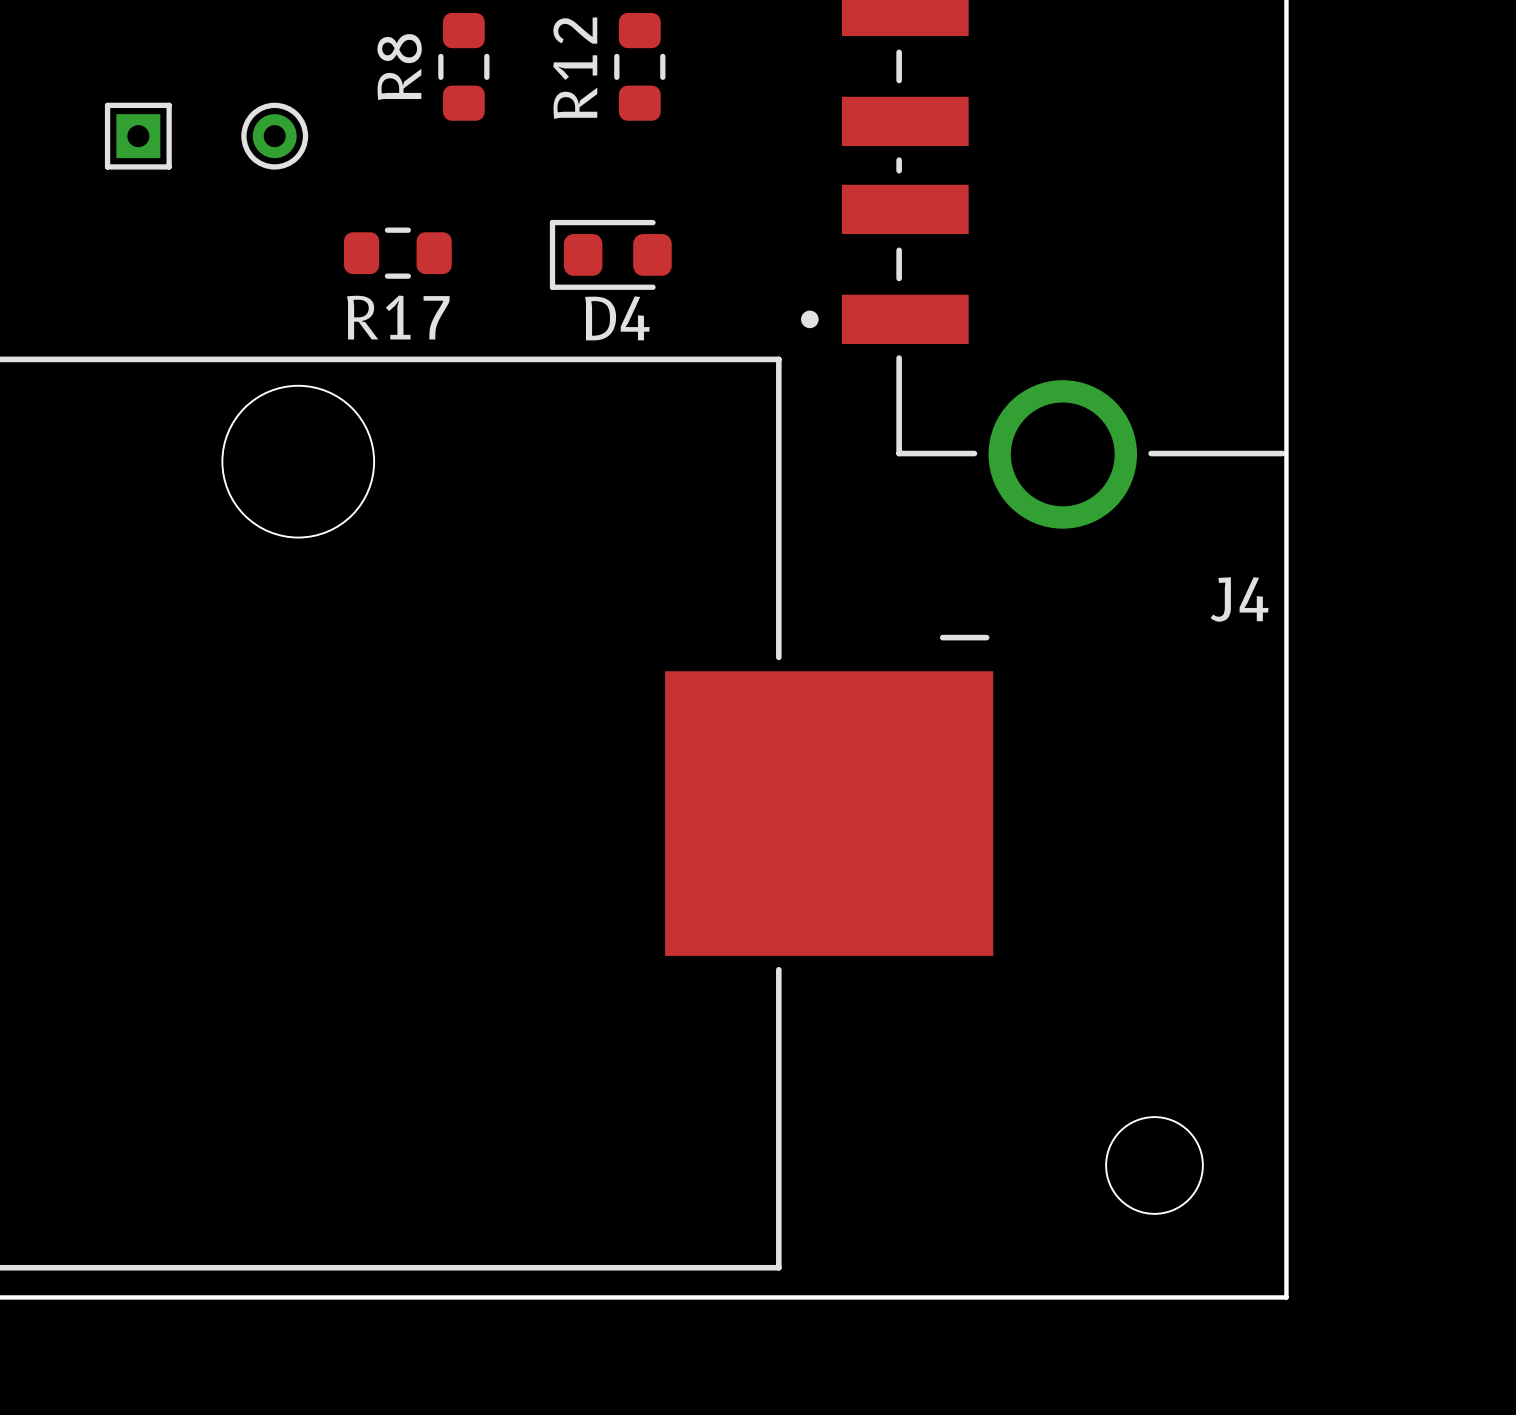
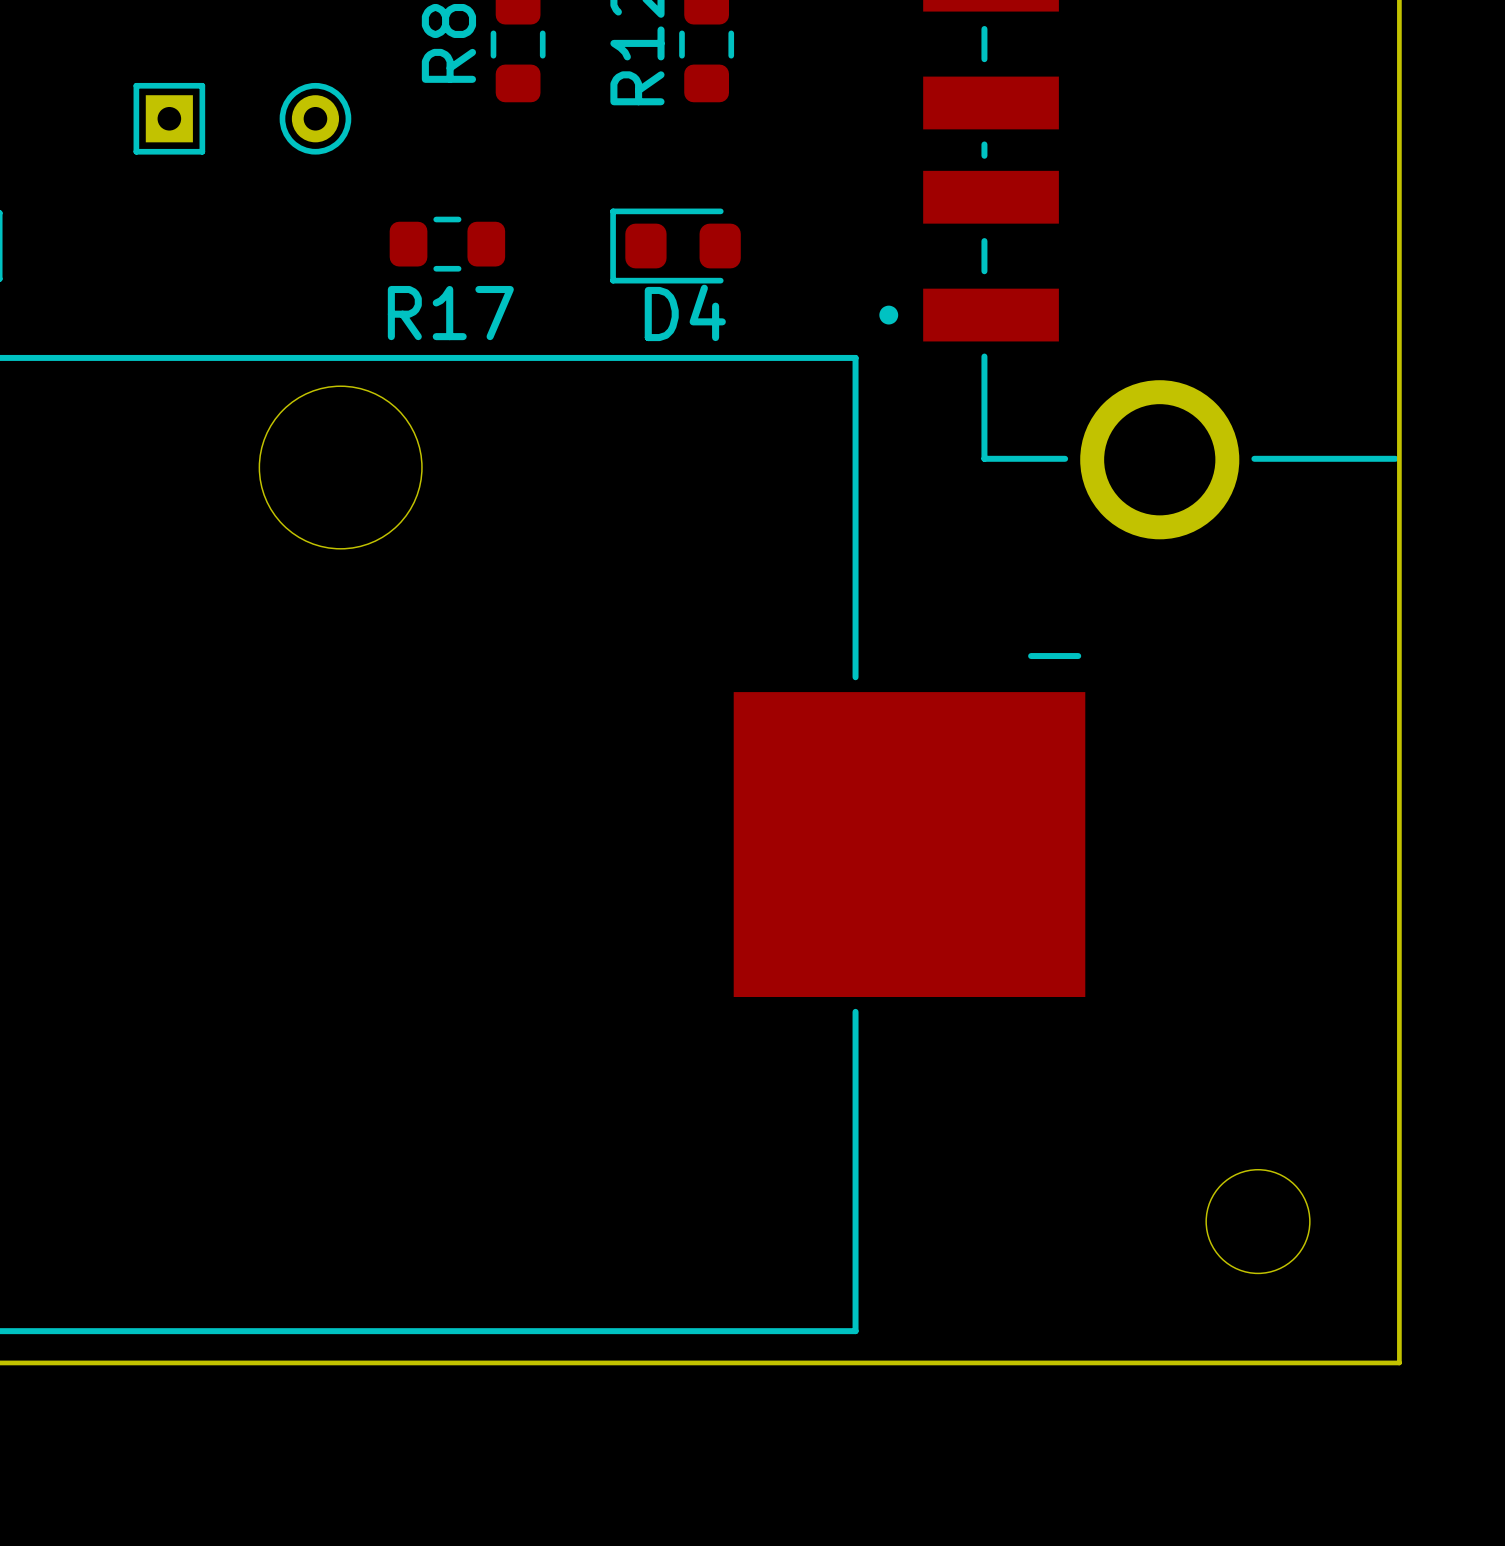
J4 name: J4 (1239, 599) -> none

